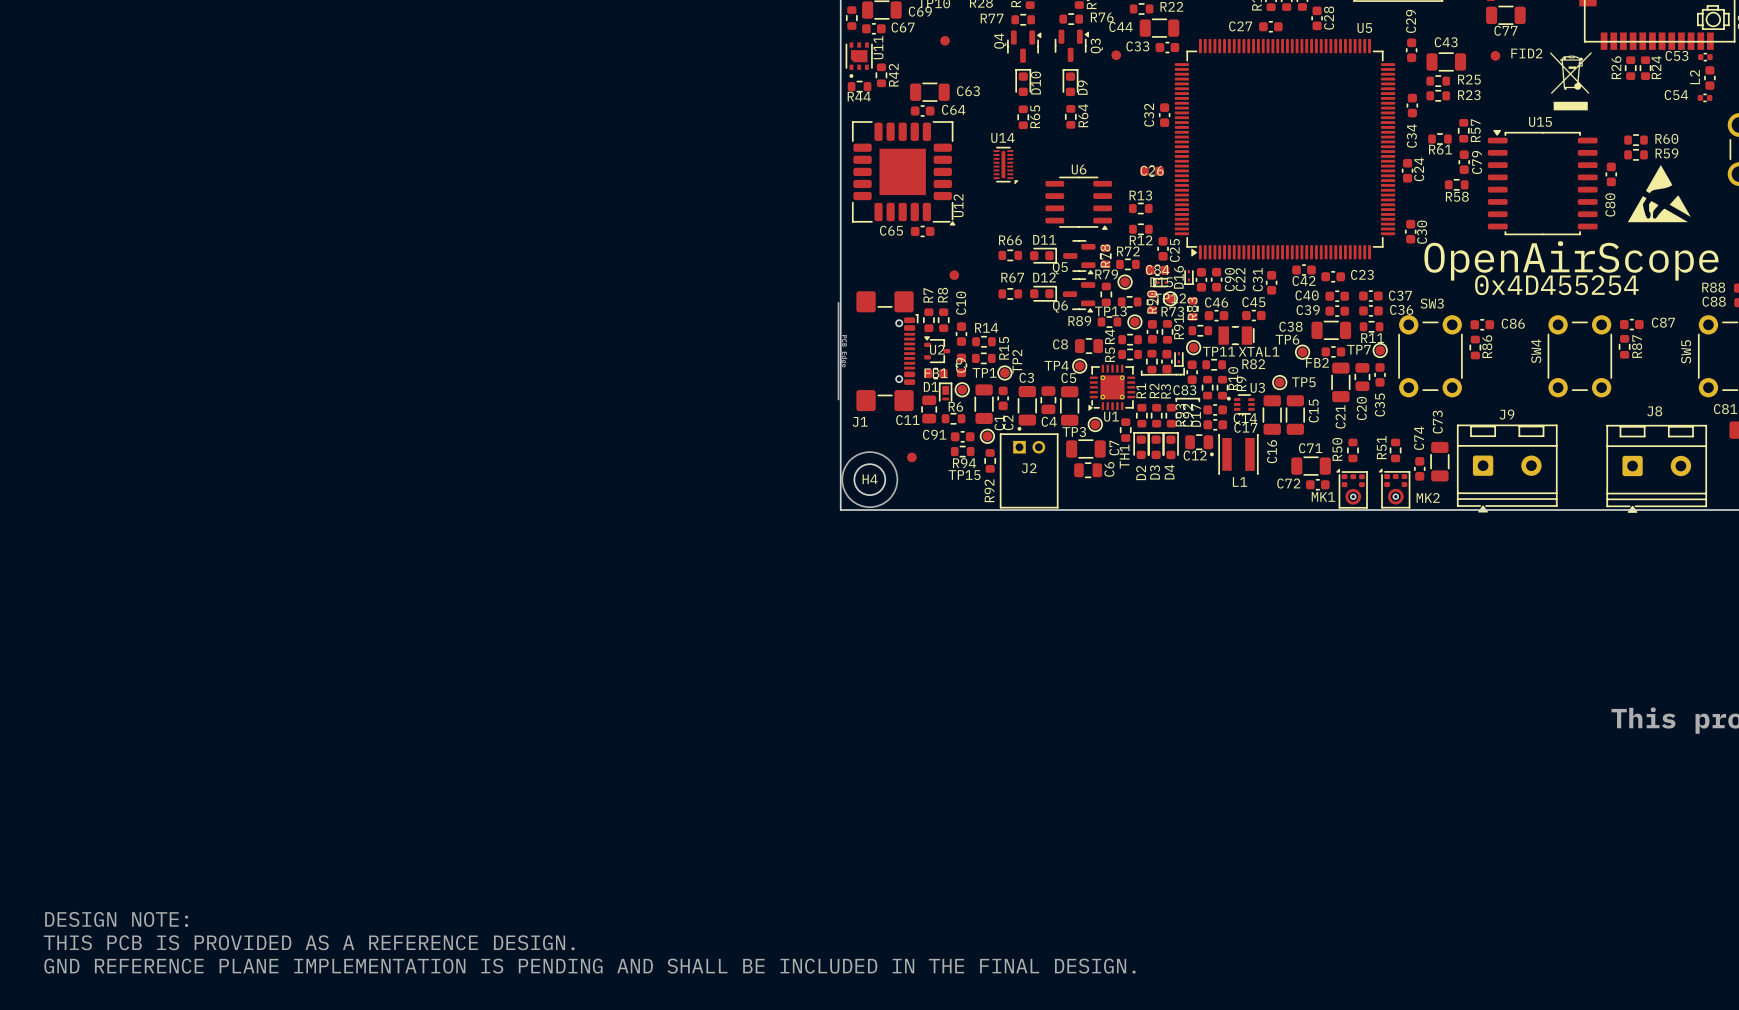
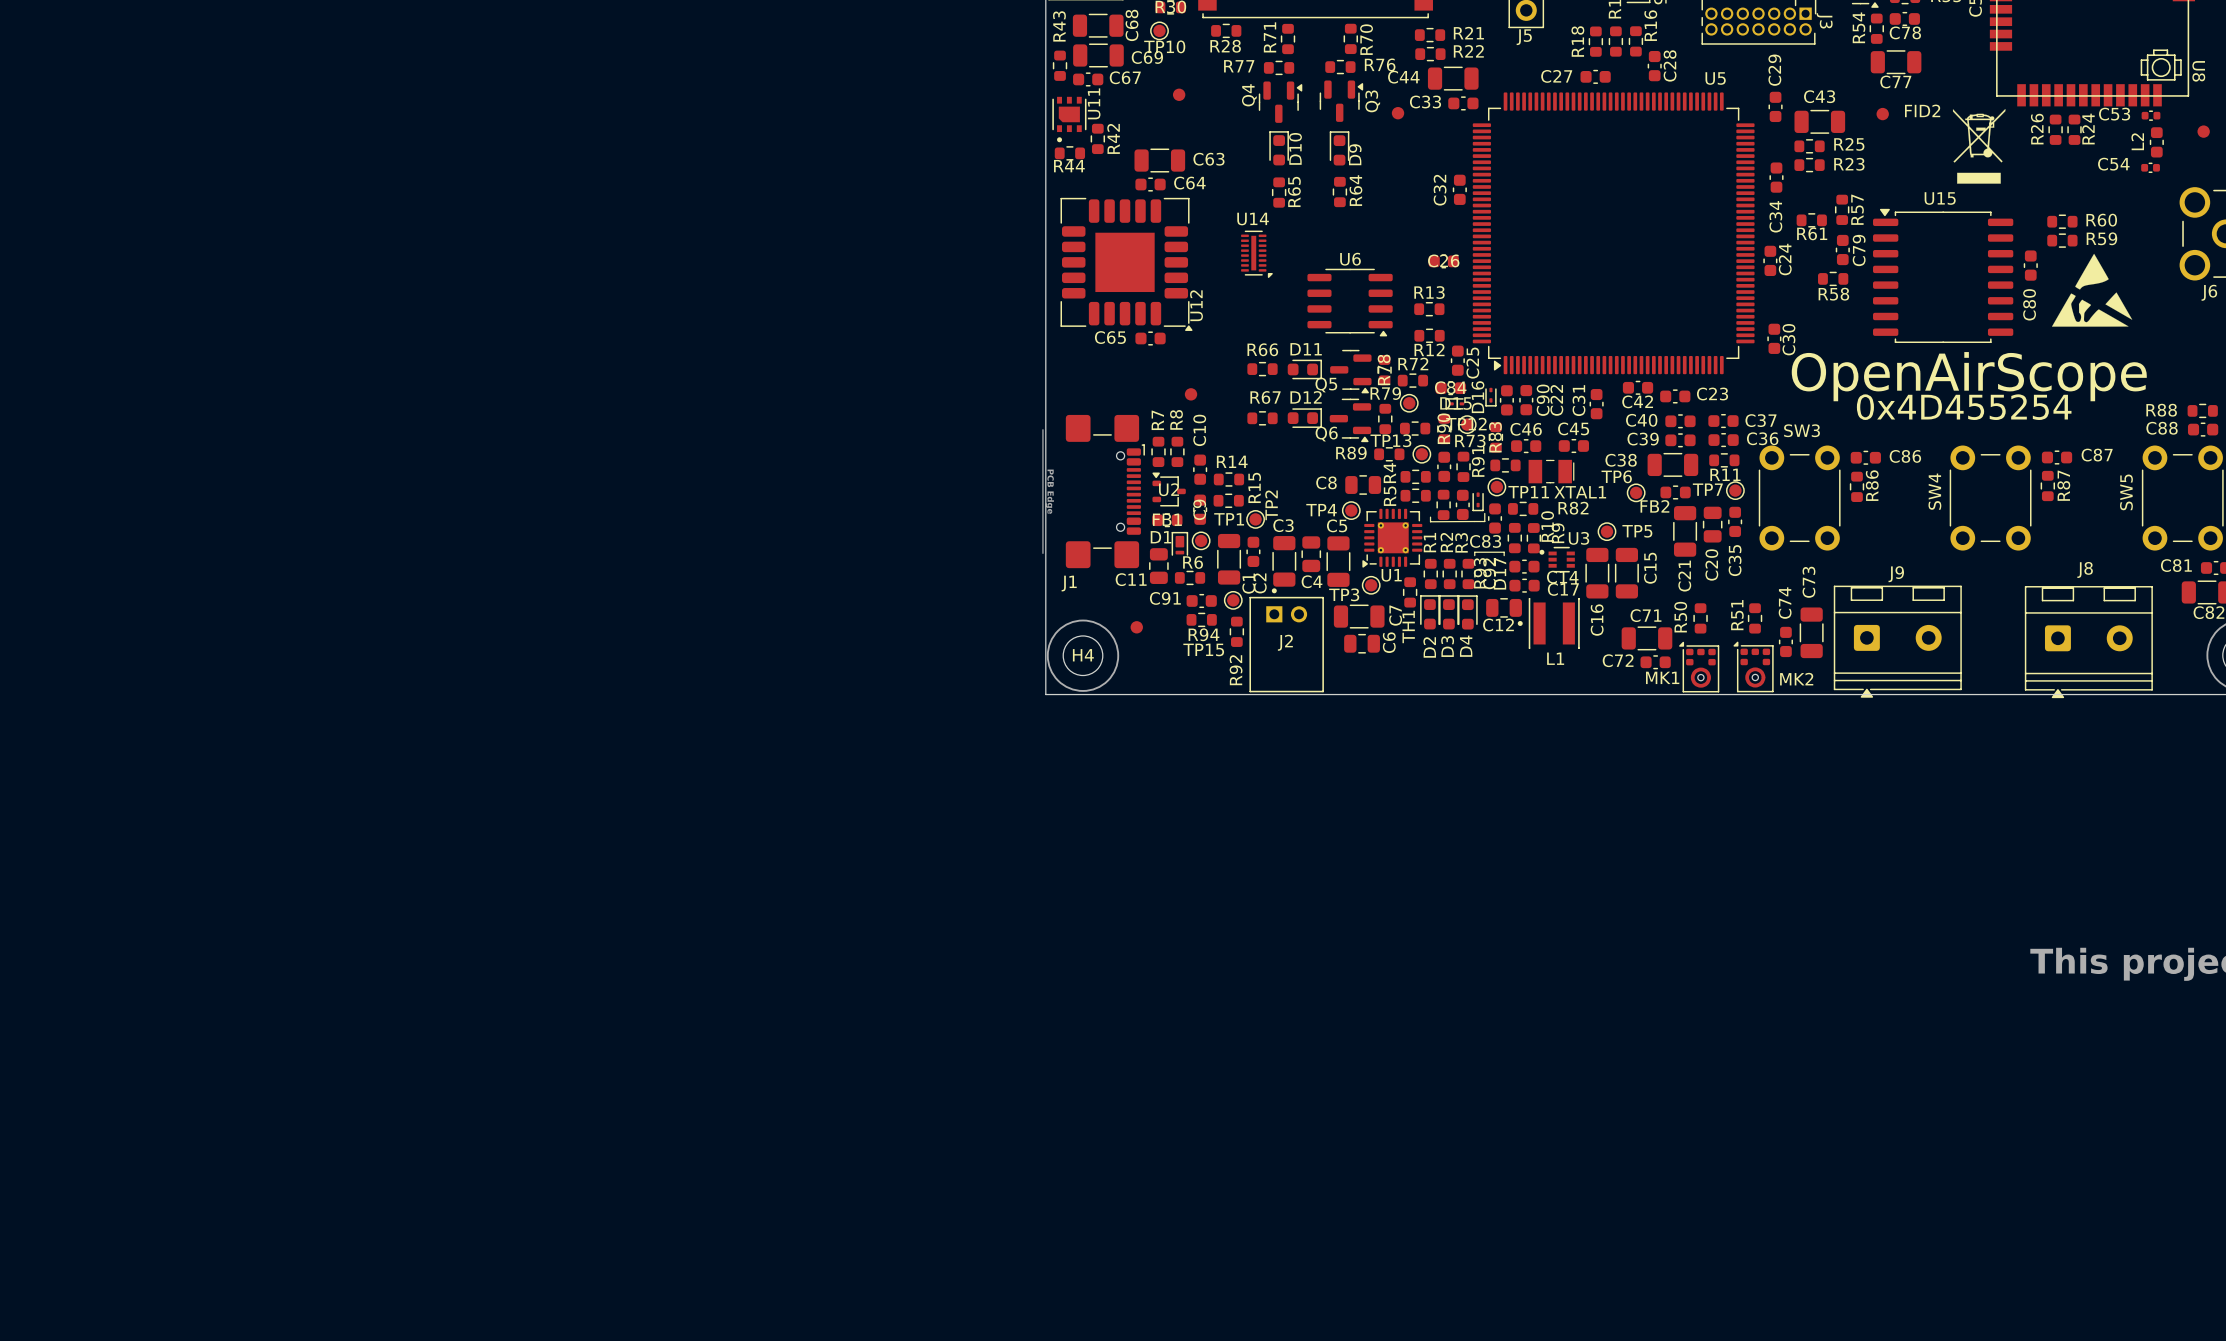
text: DESIGN NOTE: (116, 919) -> none
text: THIS PCB IS PROVIDED AS A REFERENCE DESIGN. (309, 942) -> none
text: GND REFERENCE PLANE IMPLEMENTATION IS PENDING AND SHALL BE INCLUDED IN THE FINAL DESIGN. (589, 966) -> none

